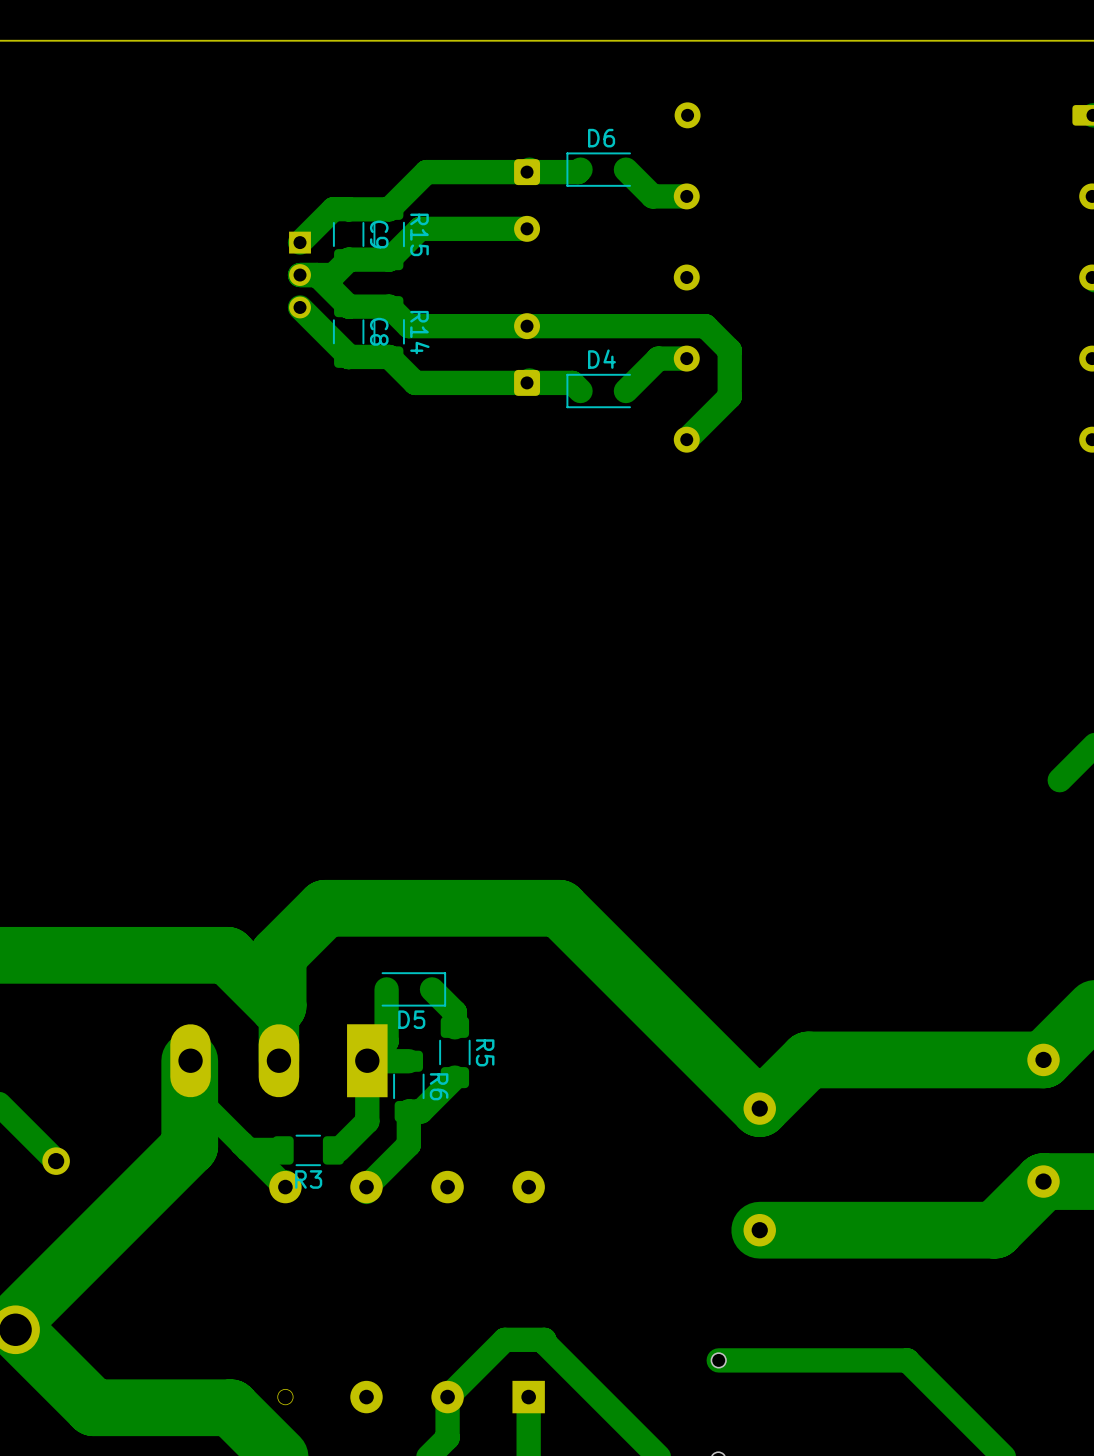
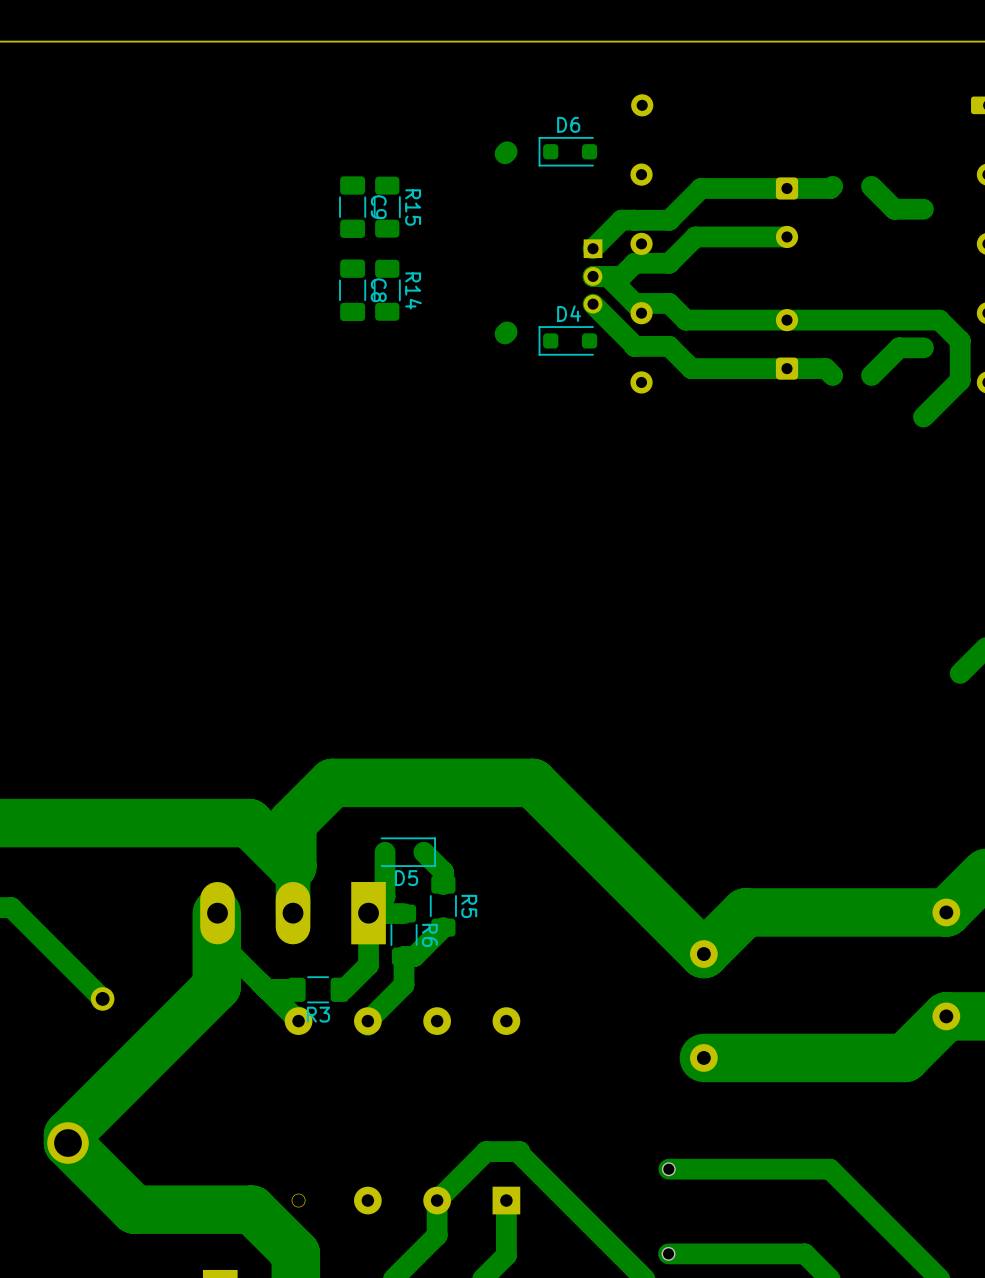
track: (580, 169) (578, 172) (426, 172) (389, 209) (348, 209) -> (832, 186) (830, 188) (701, 188) (669, 220) (634, 220)
track: (625, 169) (652, 196) (686, 196) -> (871, 186) (894, 209) (923, 209)
part: (527, 200) -> none
track: (348, 209) (333, 209) (300, 242) -> (634, 220) (621, 220) (593, 248)
track: (527, 228) (419, 228) (389, 259) (348, 259) (333, 275) (300, 275) -> (787, 236) (695, 236) (669, 263) (634, 263) (621, 276) (593, 276)
part: none -> (787, 212)
part position: (300, 275) -> (593, 276)
track: (317, 275) (348, 306) (389, 306) (408, 326) (705, 326) (729, 350) (729, 396) (686, 439) -> (607, 276) (634, 303) (669, 303) (685, 320) (939, 320) (960, 340) (960, 380) (923, 417)
track: (300, 307) (348, 357) -> (593, 304) (634, 346)
part: (527, 354) -> none
track: (348, 356) (389, 356) (415, 382) (572, 382) (580, 391) -> (634, 346) (669, 346) (691, 368) (825, 368) (832, 375)
track: (686, 358) (658, 358) (625, 391) -> (923, 347) (899, 347) (871, 375)
part: none -> (787, 344)

